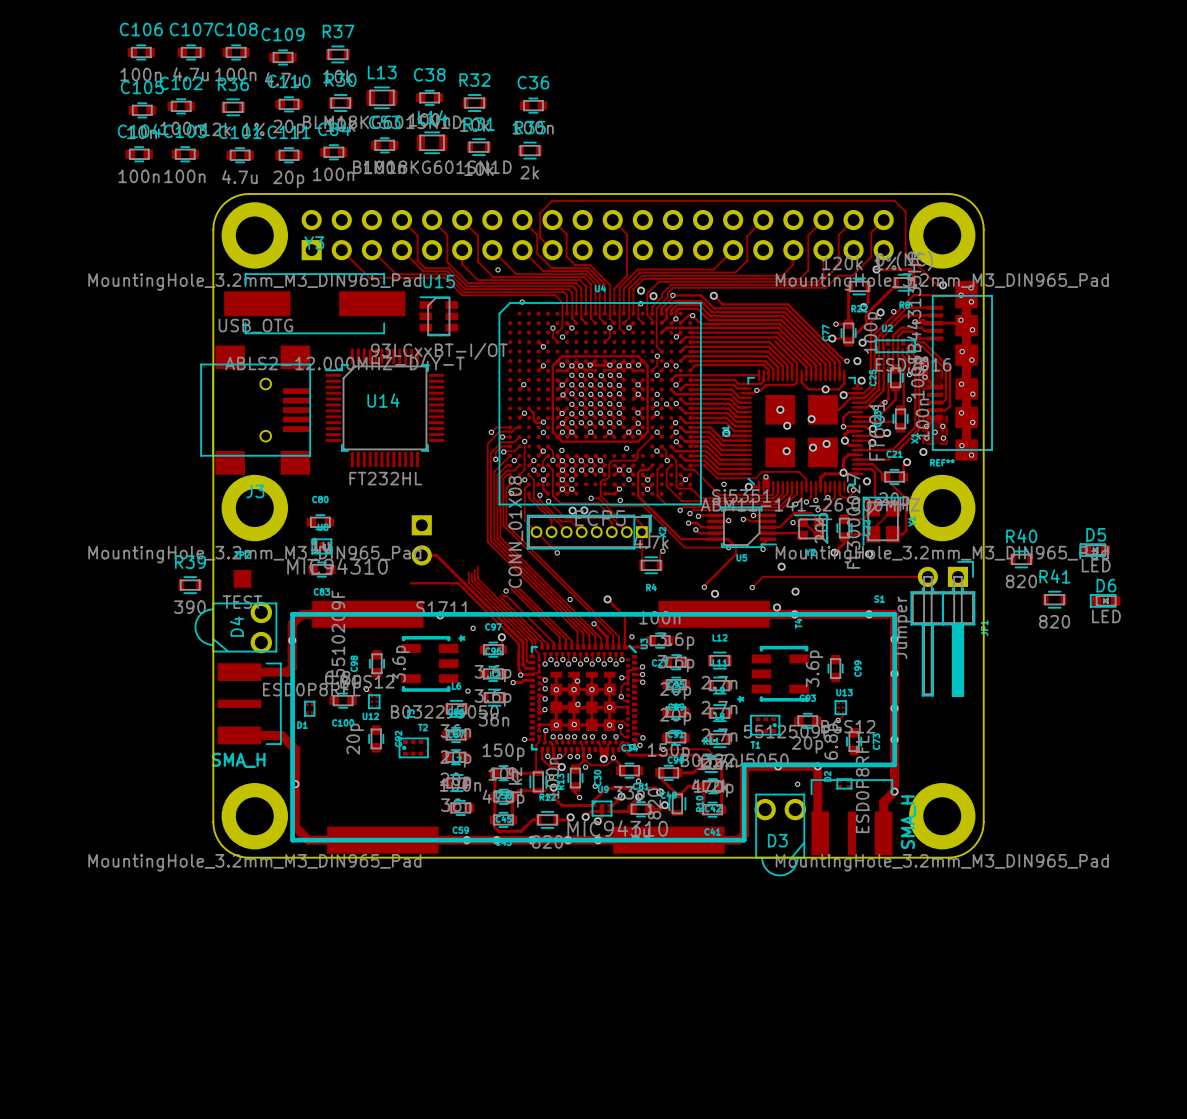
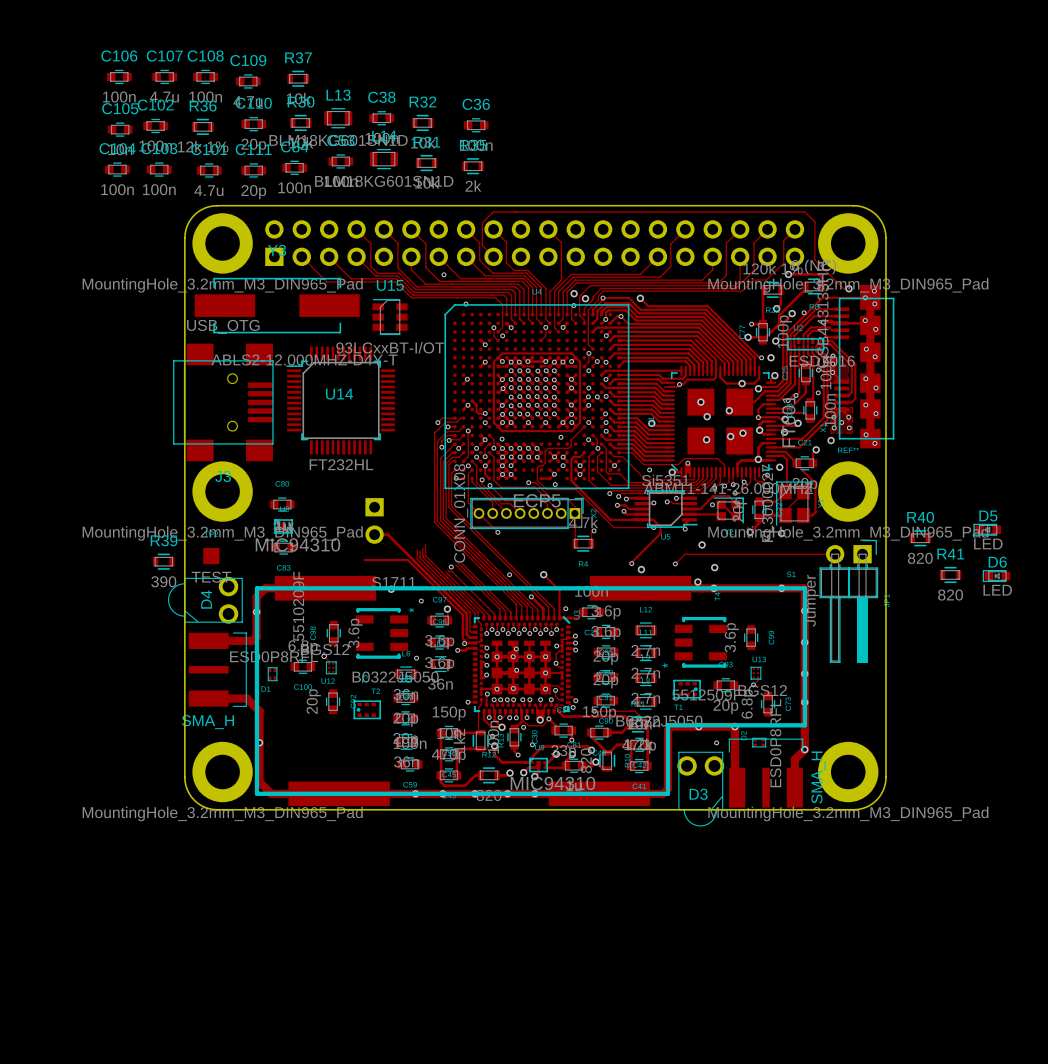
via: (572, 510) -> none
via: (584, 510) -> none

